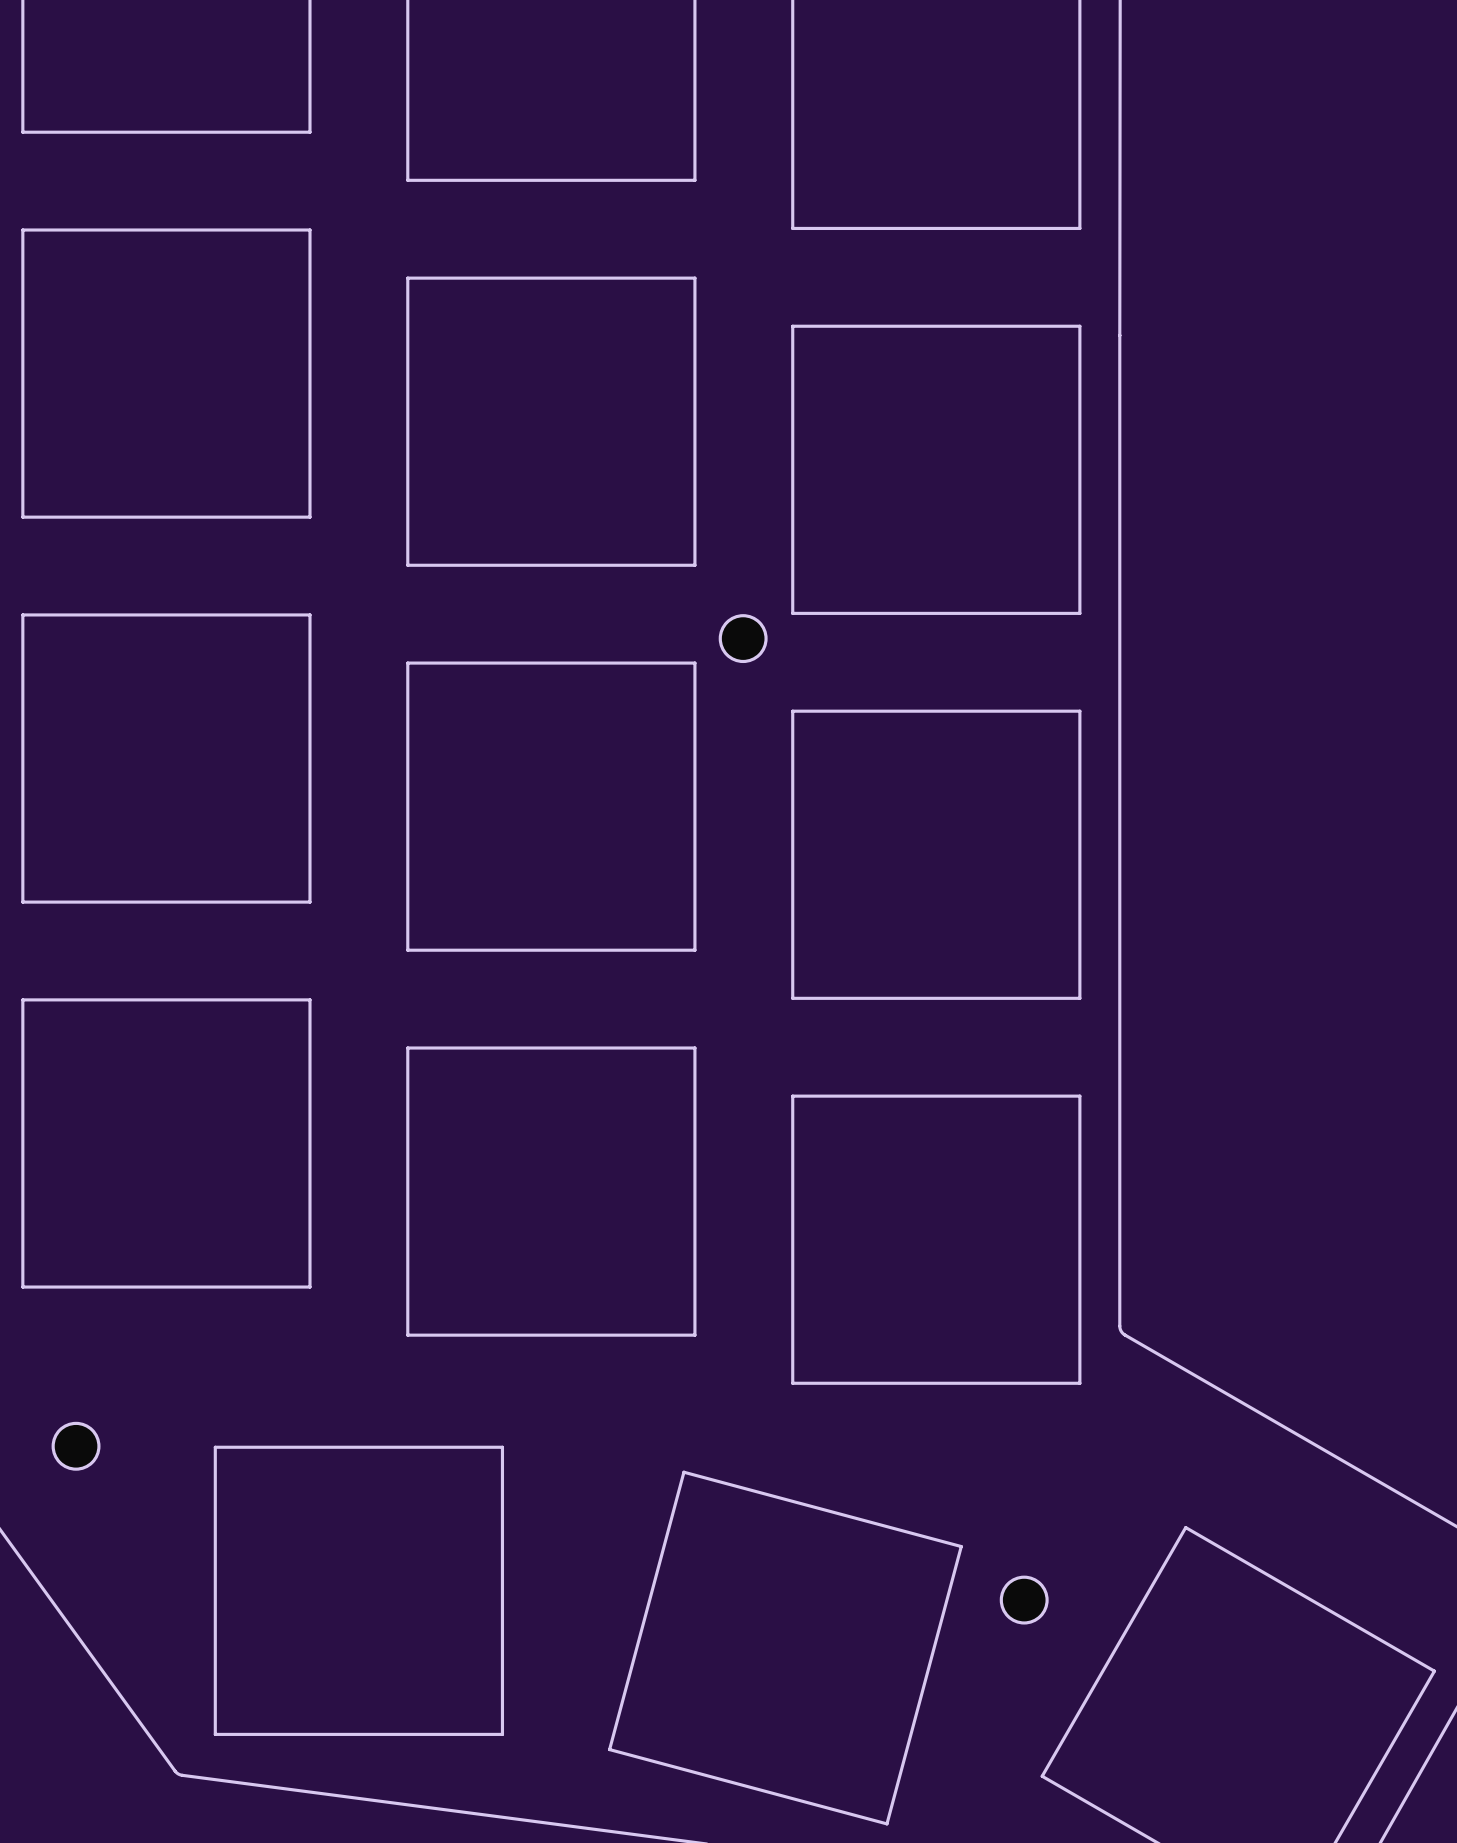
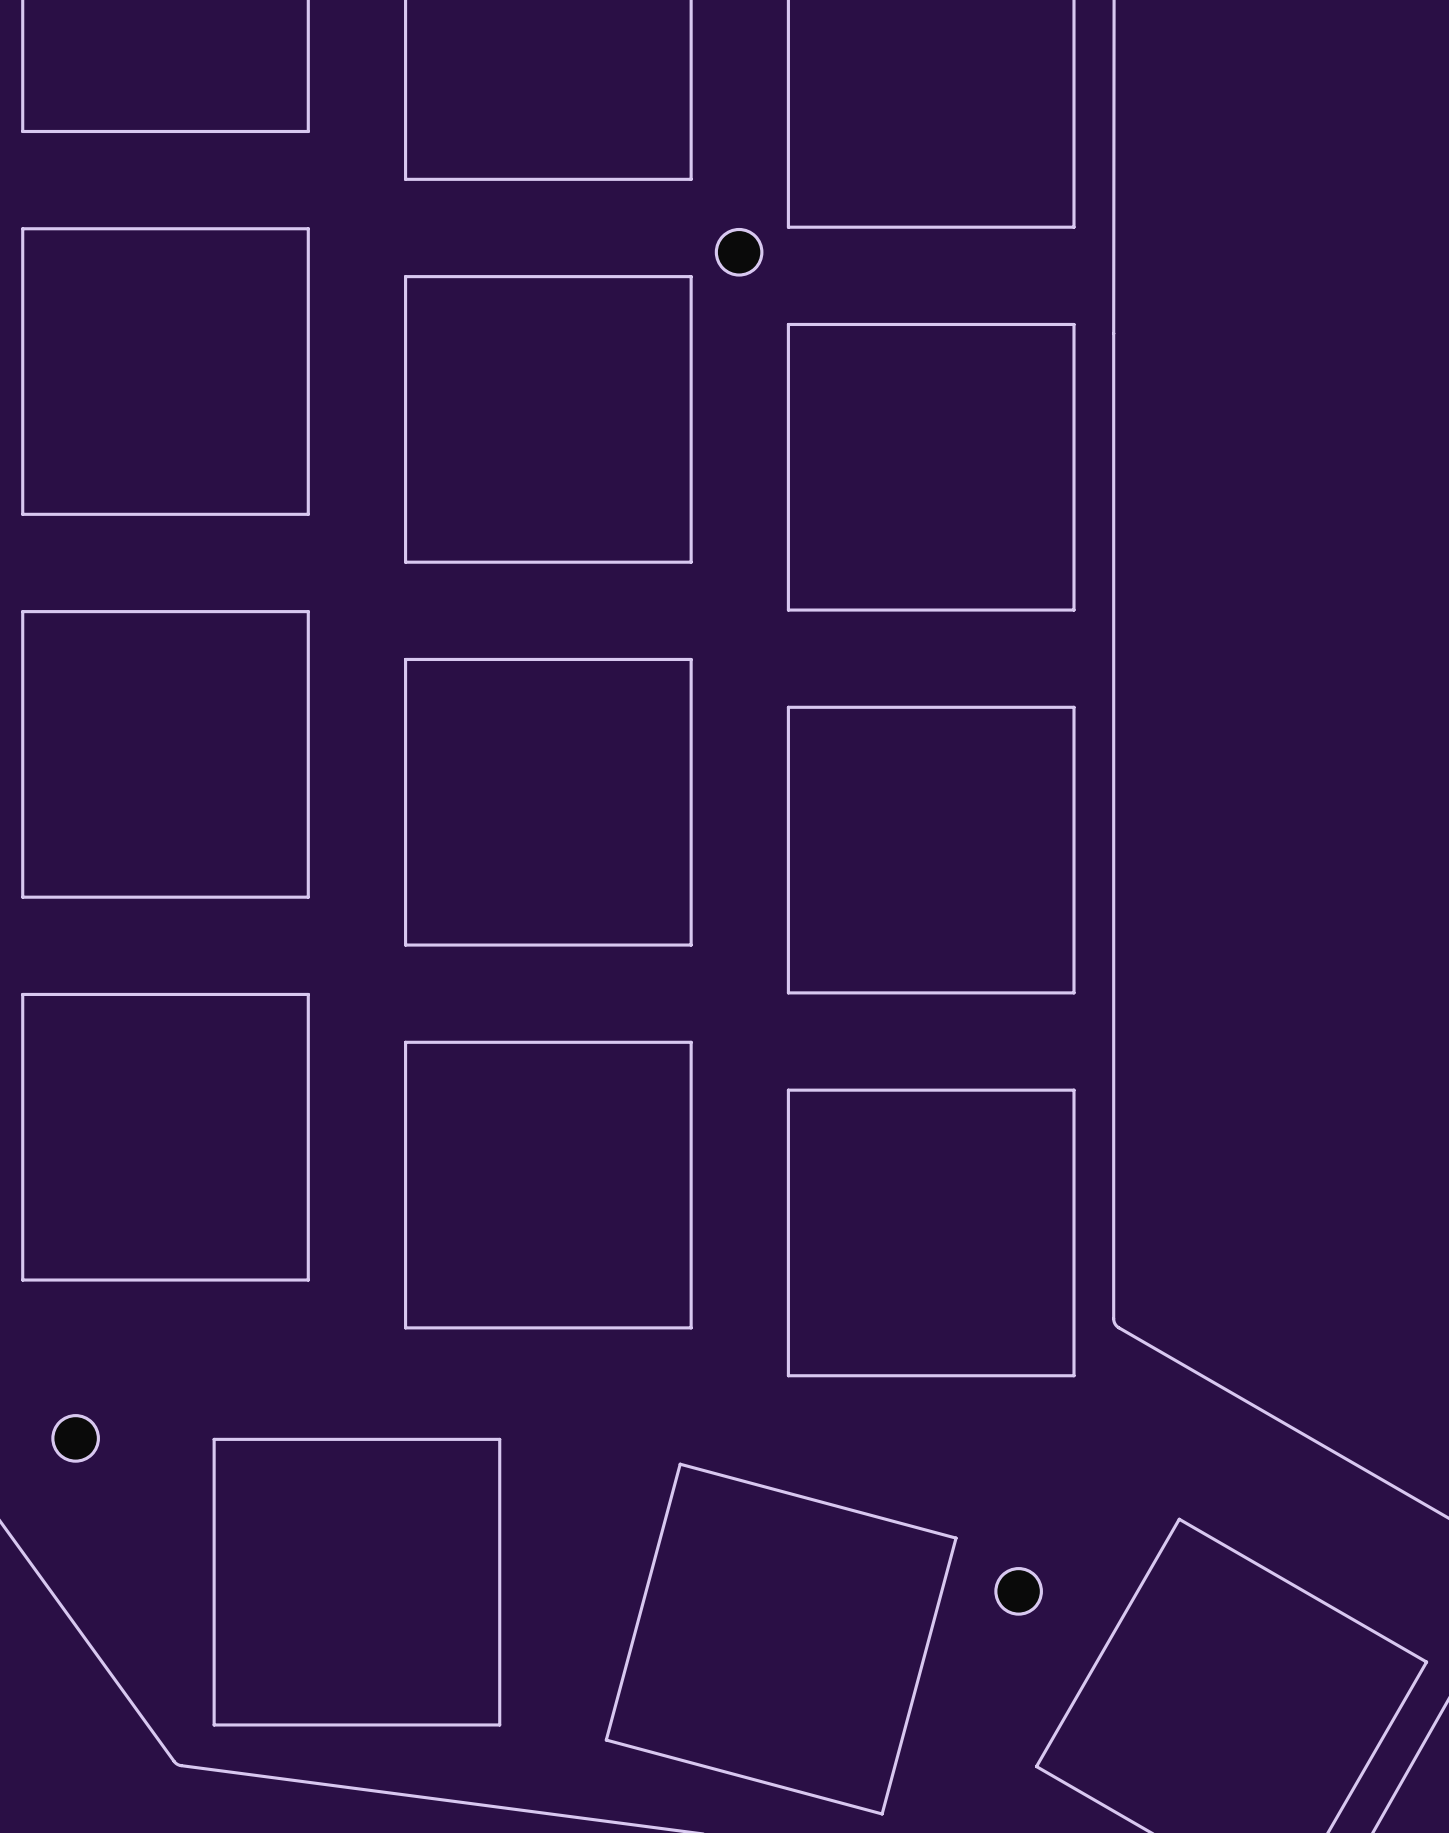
part position: (743, 638) -> (739, 252)
round board edge position: (743, 638) -> (739, 252)

